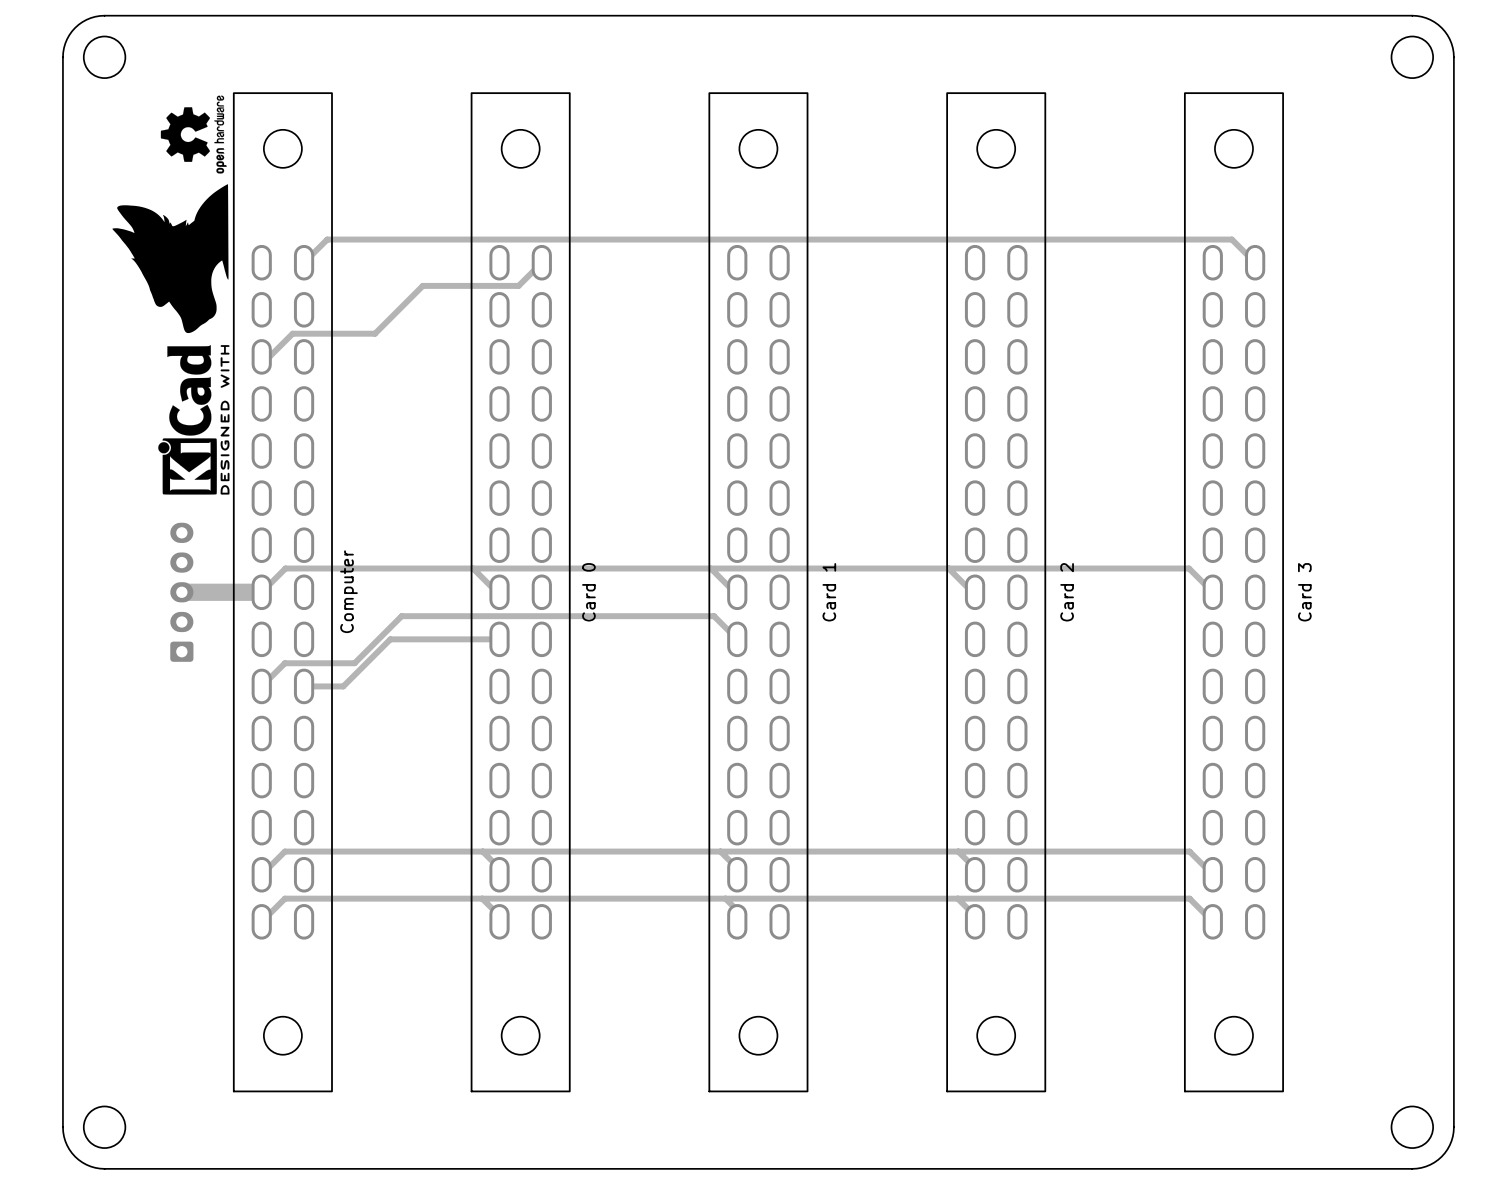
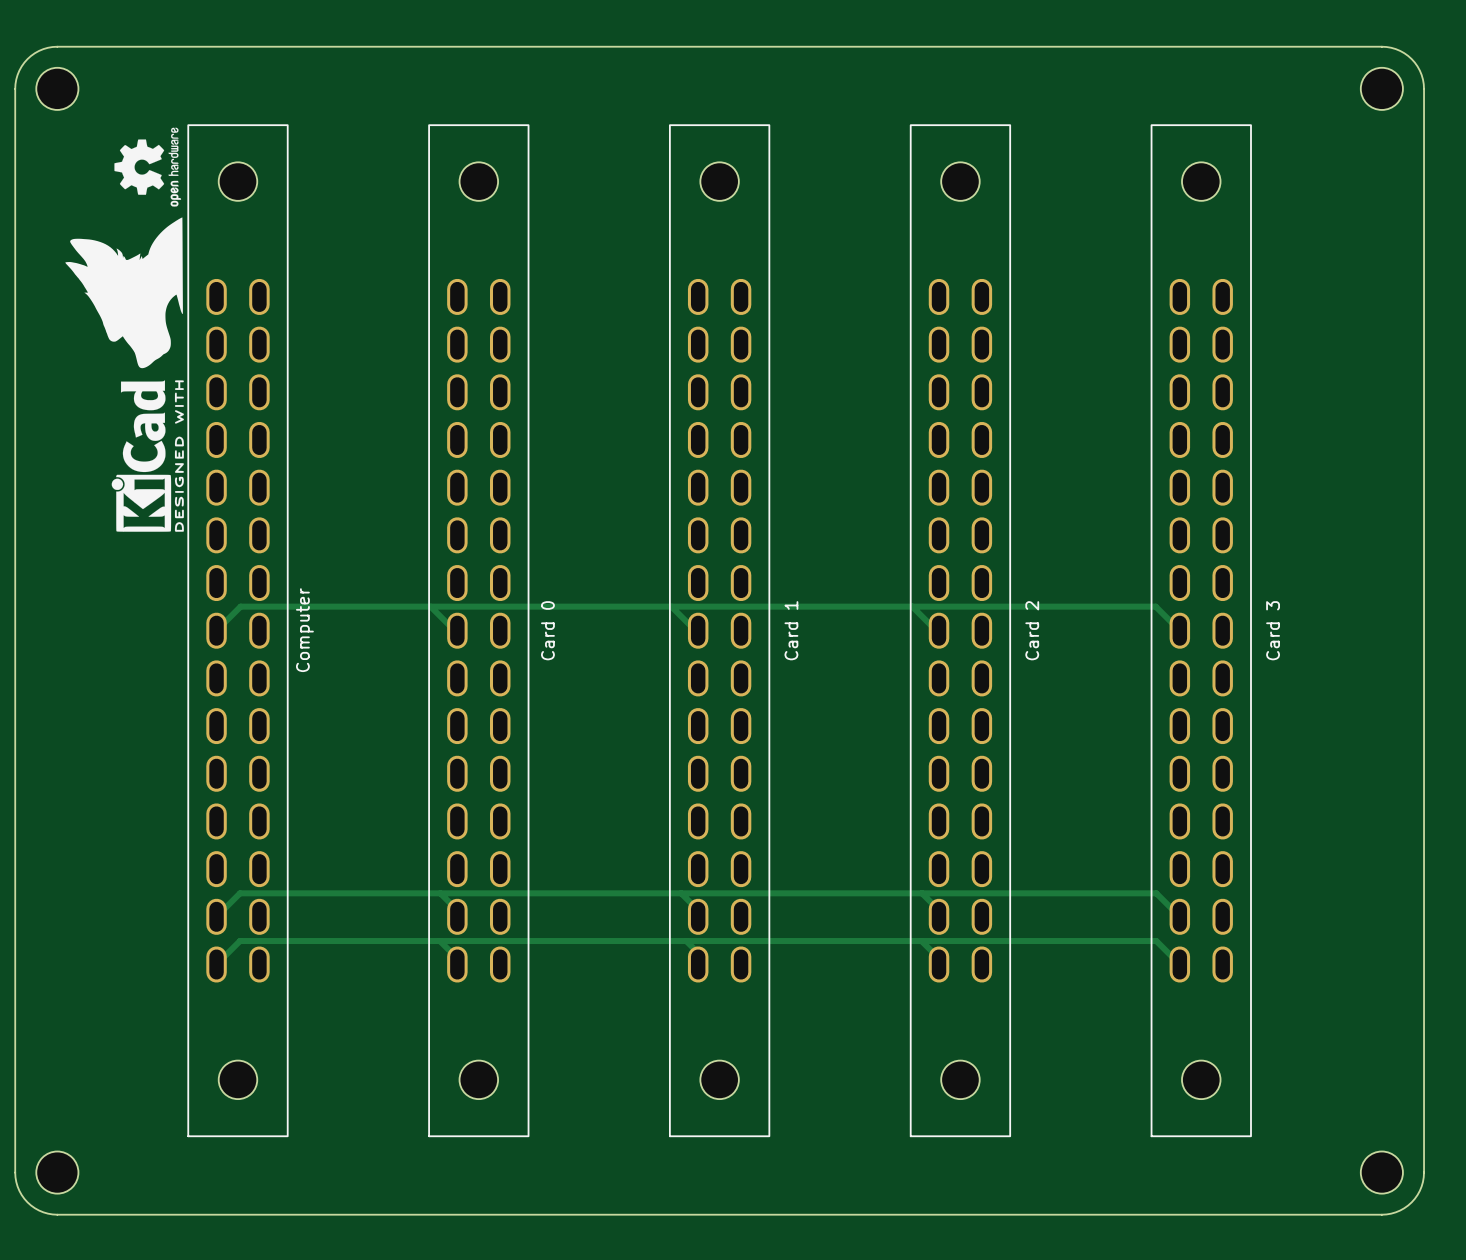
track: (304, 262) (327, 239) (1231, 239) (1255, 262) -> none
track: (541, 262) (518, 285) (422, 285) (375, 333) (292, 333) (269, 356) (261, 356) -> none
track: (181, 592) (261, 592) -> none
part: (181, 592) -> none
track: (499, 639) (390, 639) (343, 686) (304, 686) -> none
track: (737, 639) (714, 616) (401, 616) (354, 663) (284, 663) (261, 686) -> none

